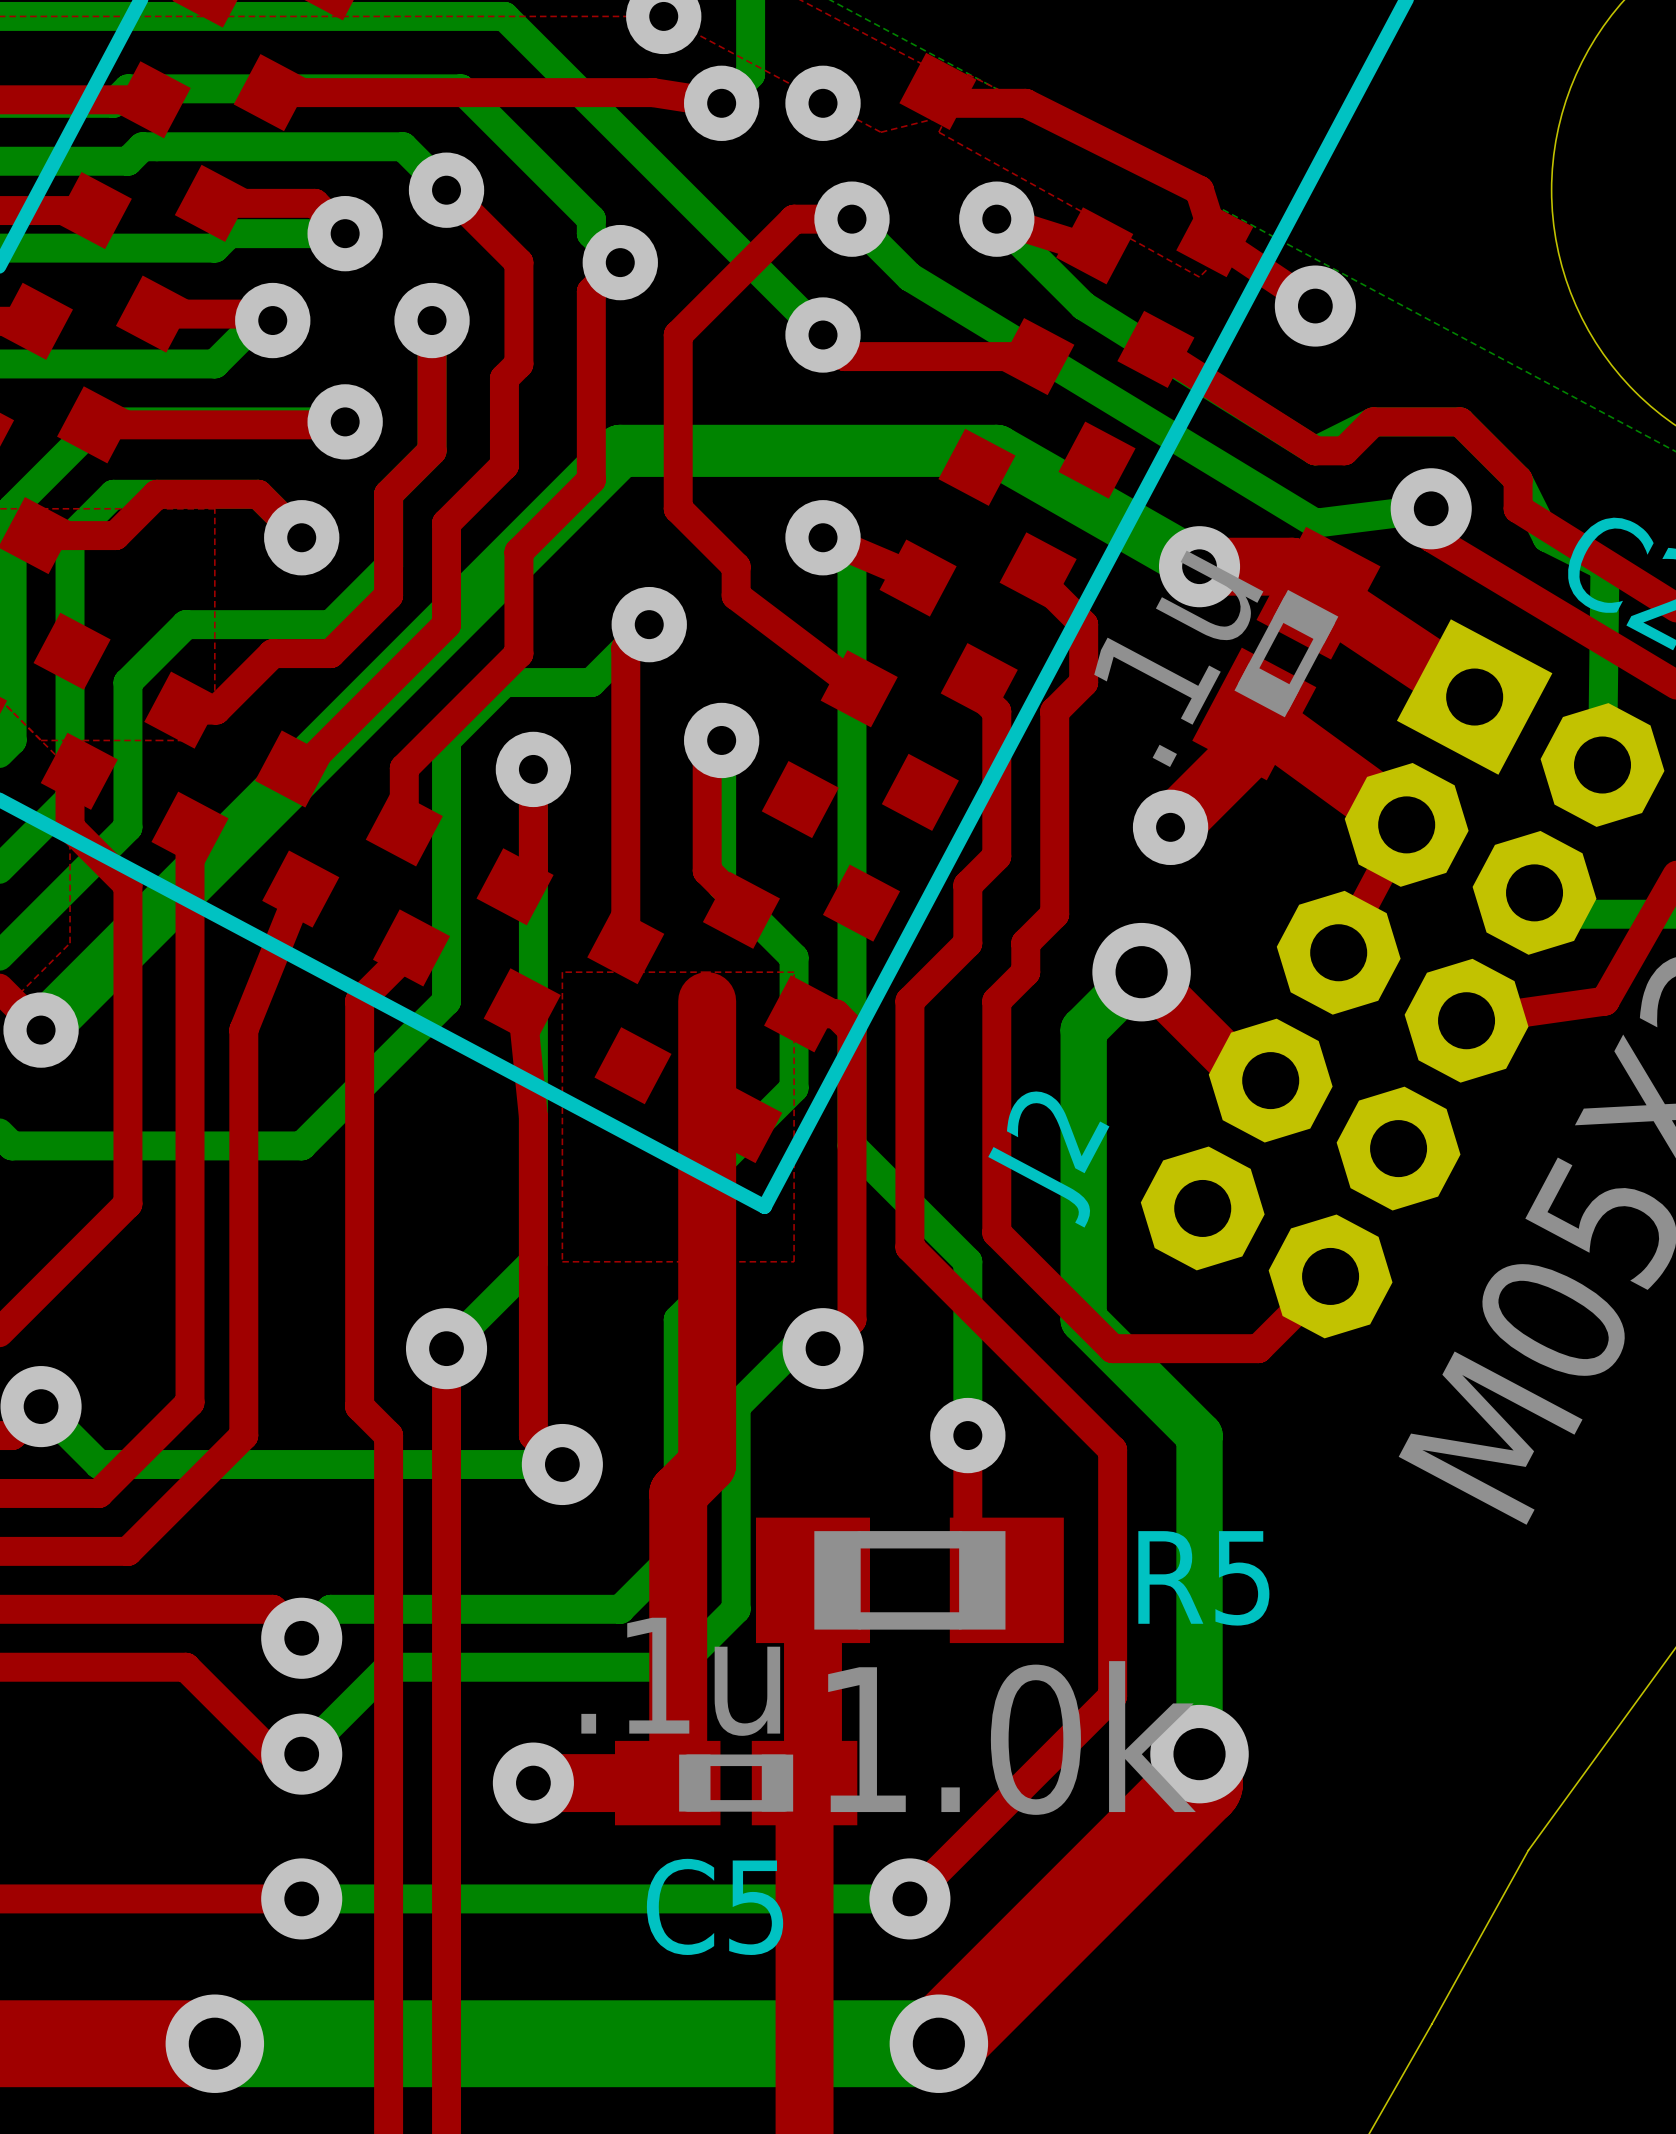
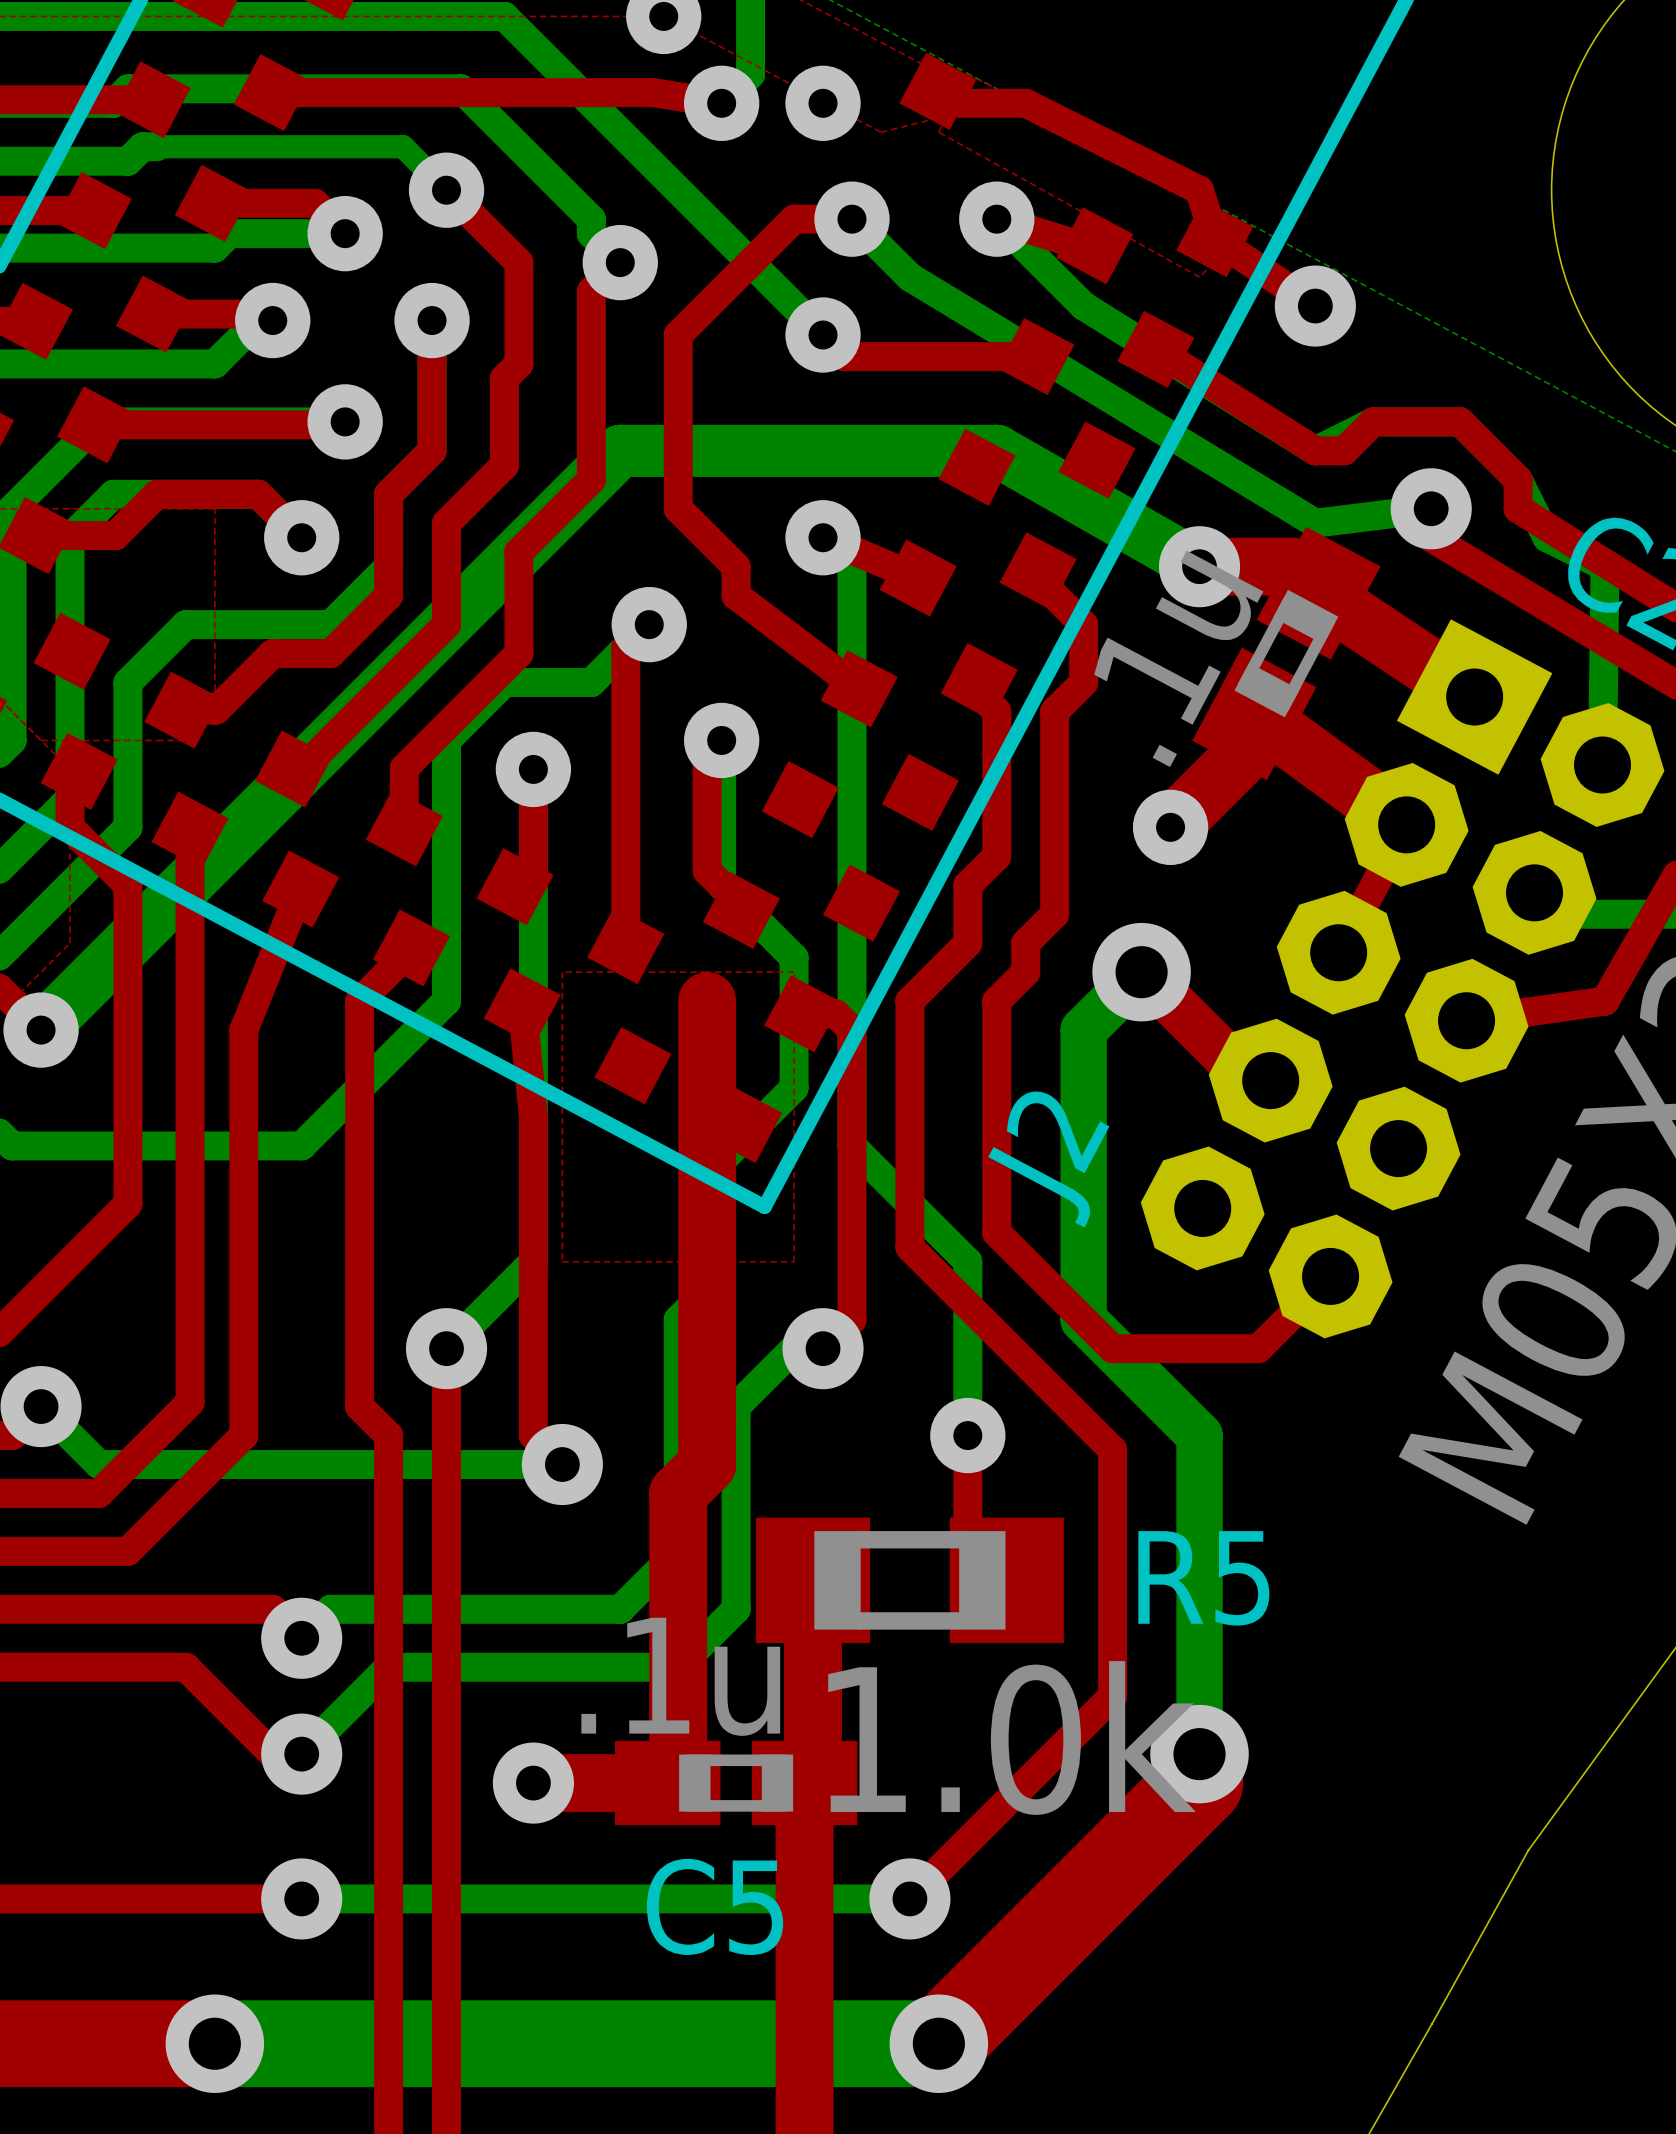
bottom track width: thick (156, 146) (403, 146) (446, 190) -> thin (156, 146) (403, 146) (446, 190)

